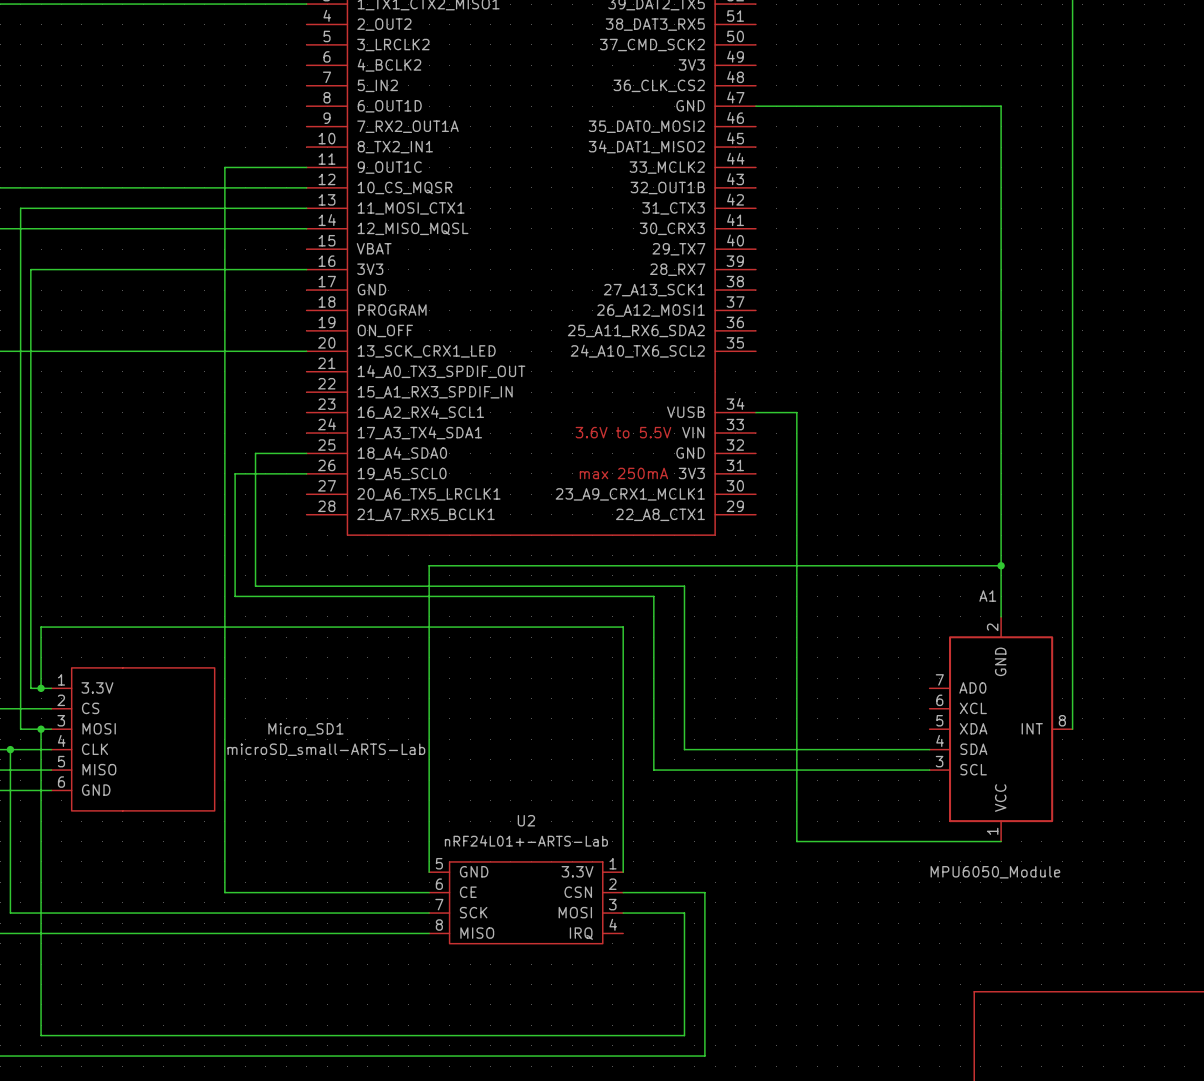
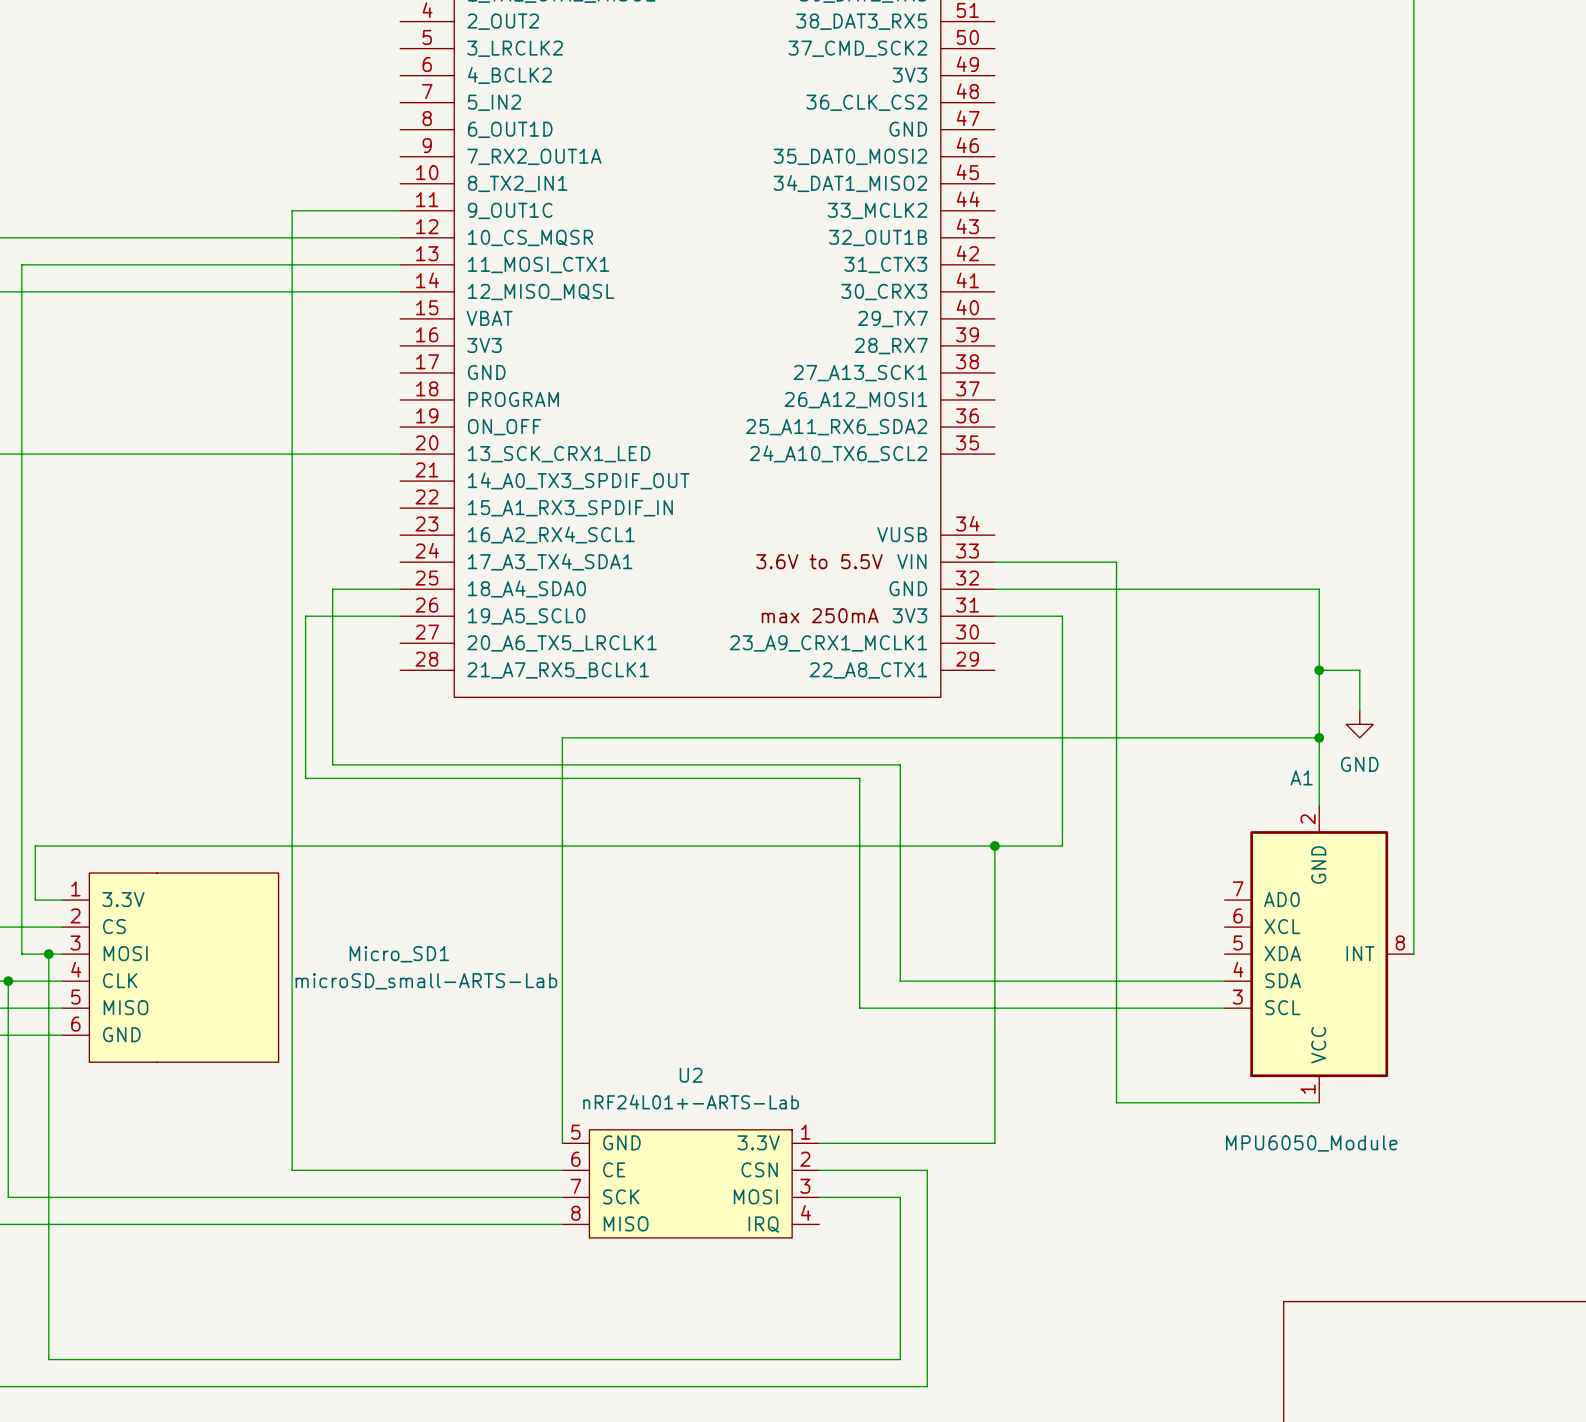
wire: (755, 106) (1001, 106) (1001, 453) -> (994, 589) (1319, 589)
wire: (306, 269) (30, 269) (30, 647) -> (994, 616) (1062, 616) (1062, 845) (35, 845)
wire: (755, 412) (796, 412) (796, 841) (847, 841) -> (994, 562) (1116, 562) (1116, 1102)
wire: none -> (1319, 670) (1359, 670) (1359, 710)
junction: none -> (1319, 670)
power symbol: none -> GND (1359, 724)
junction: none -> (994, 845)
wire: (41, 688) (41, 627) (623, 627) (623, 872) -> (994, 845) (994, 1143) (819, 1143)
junction: (41, 688) -> none

